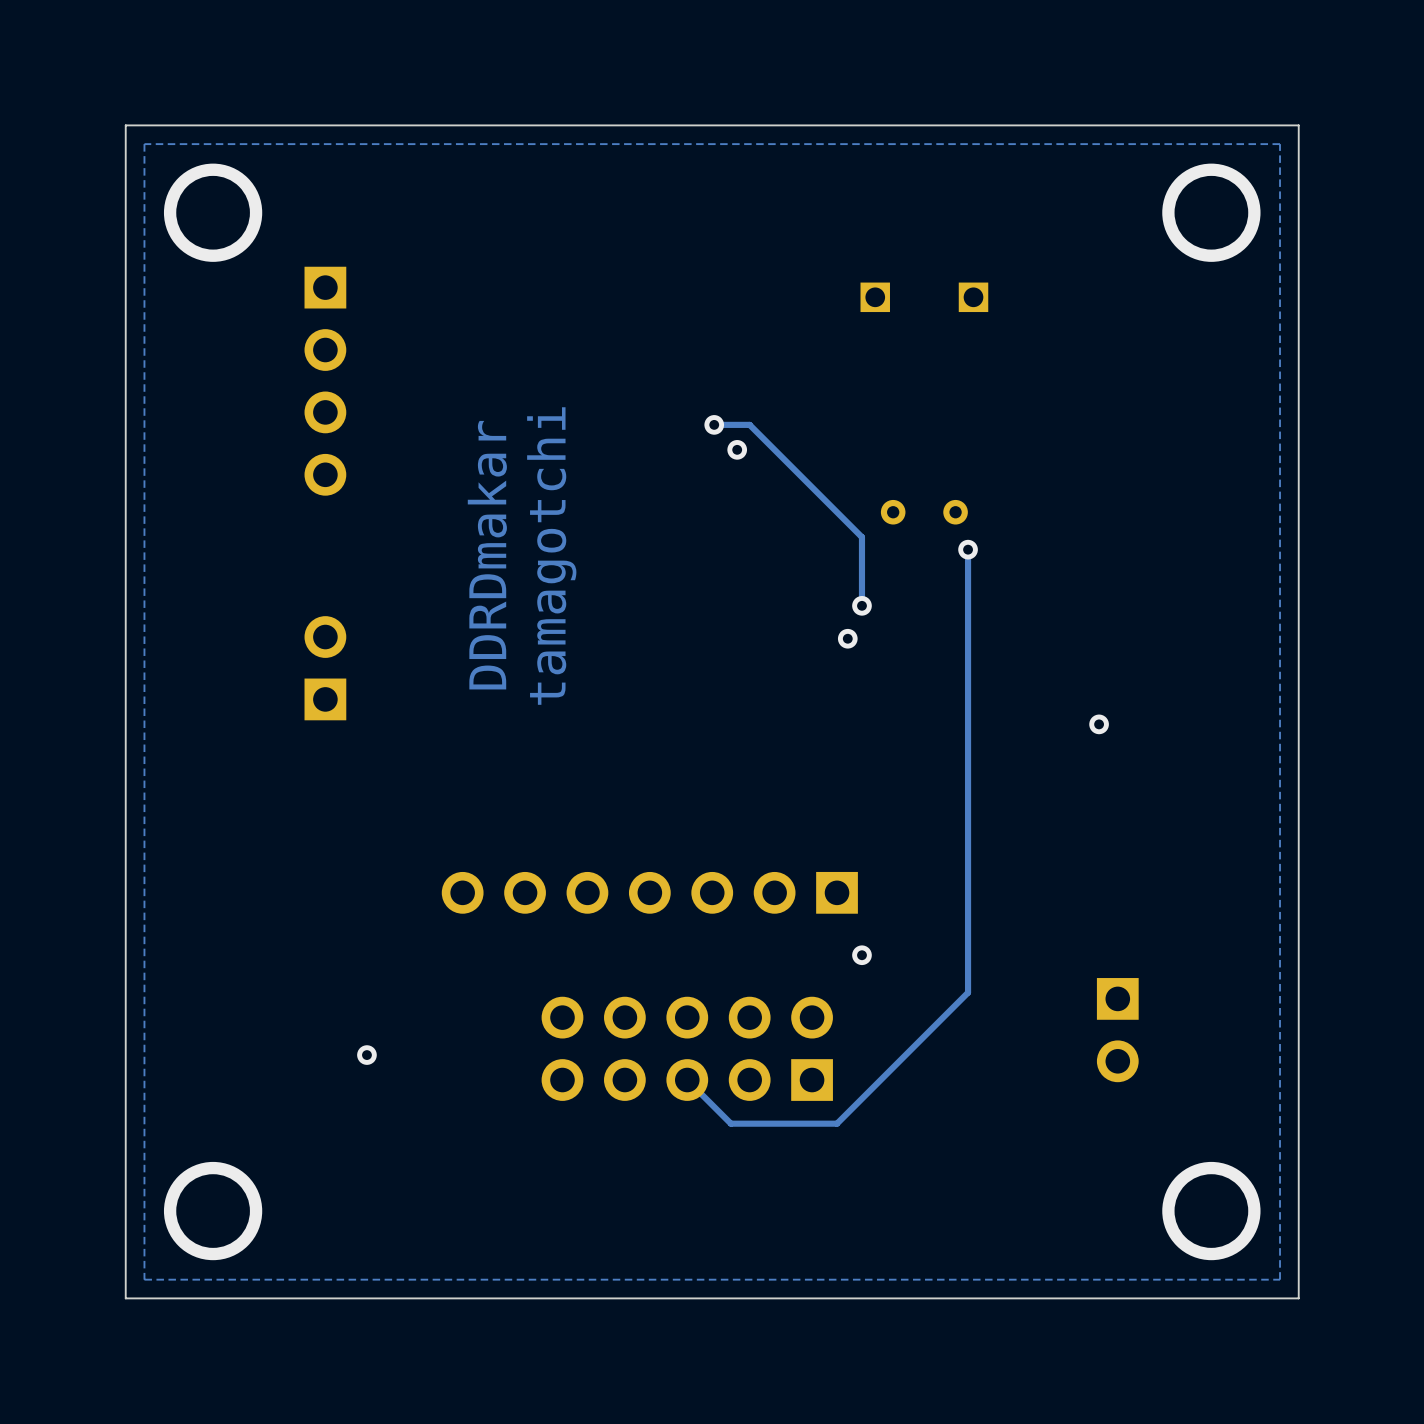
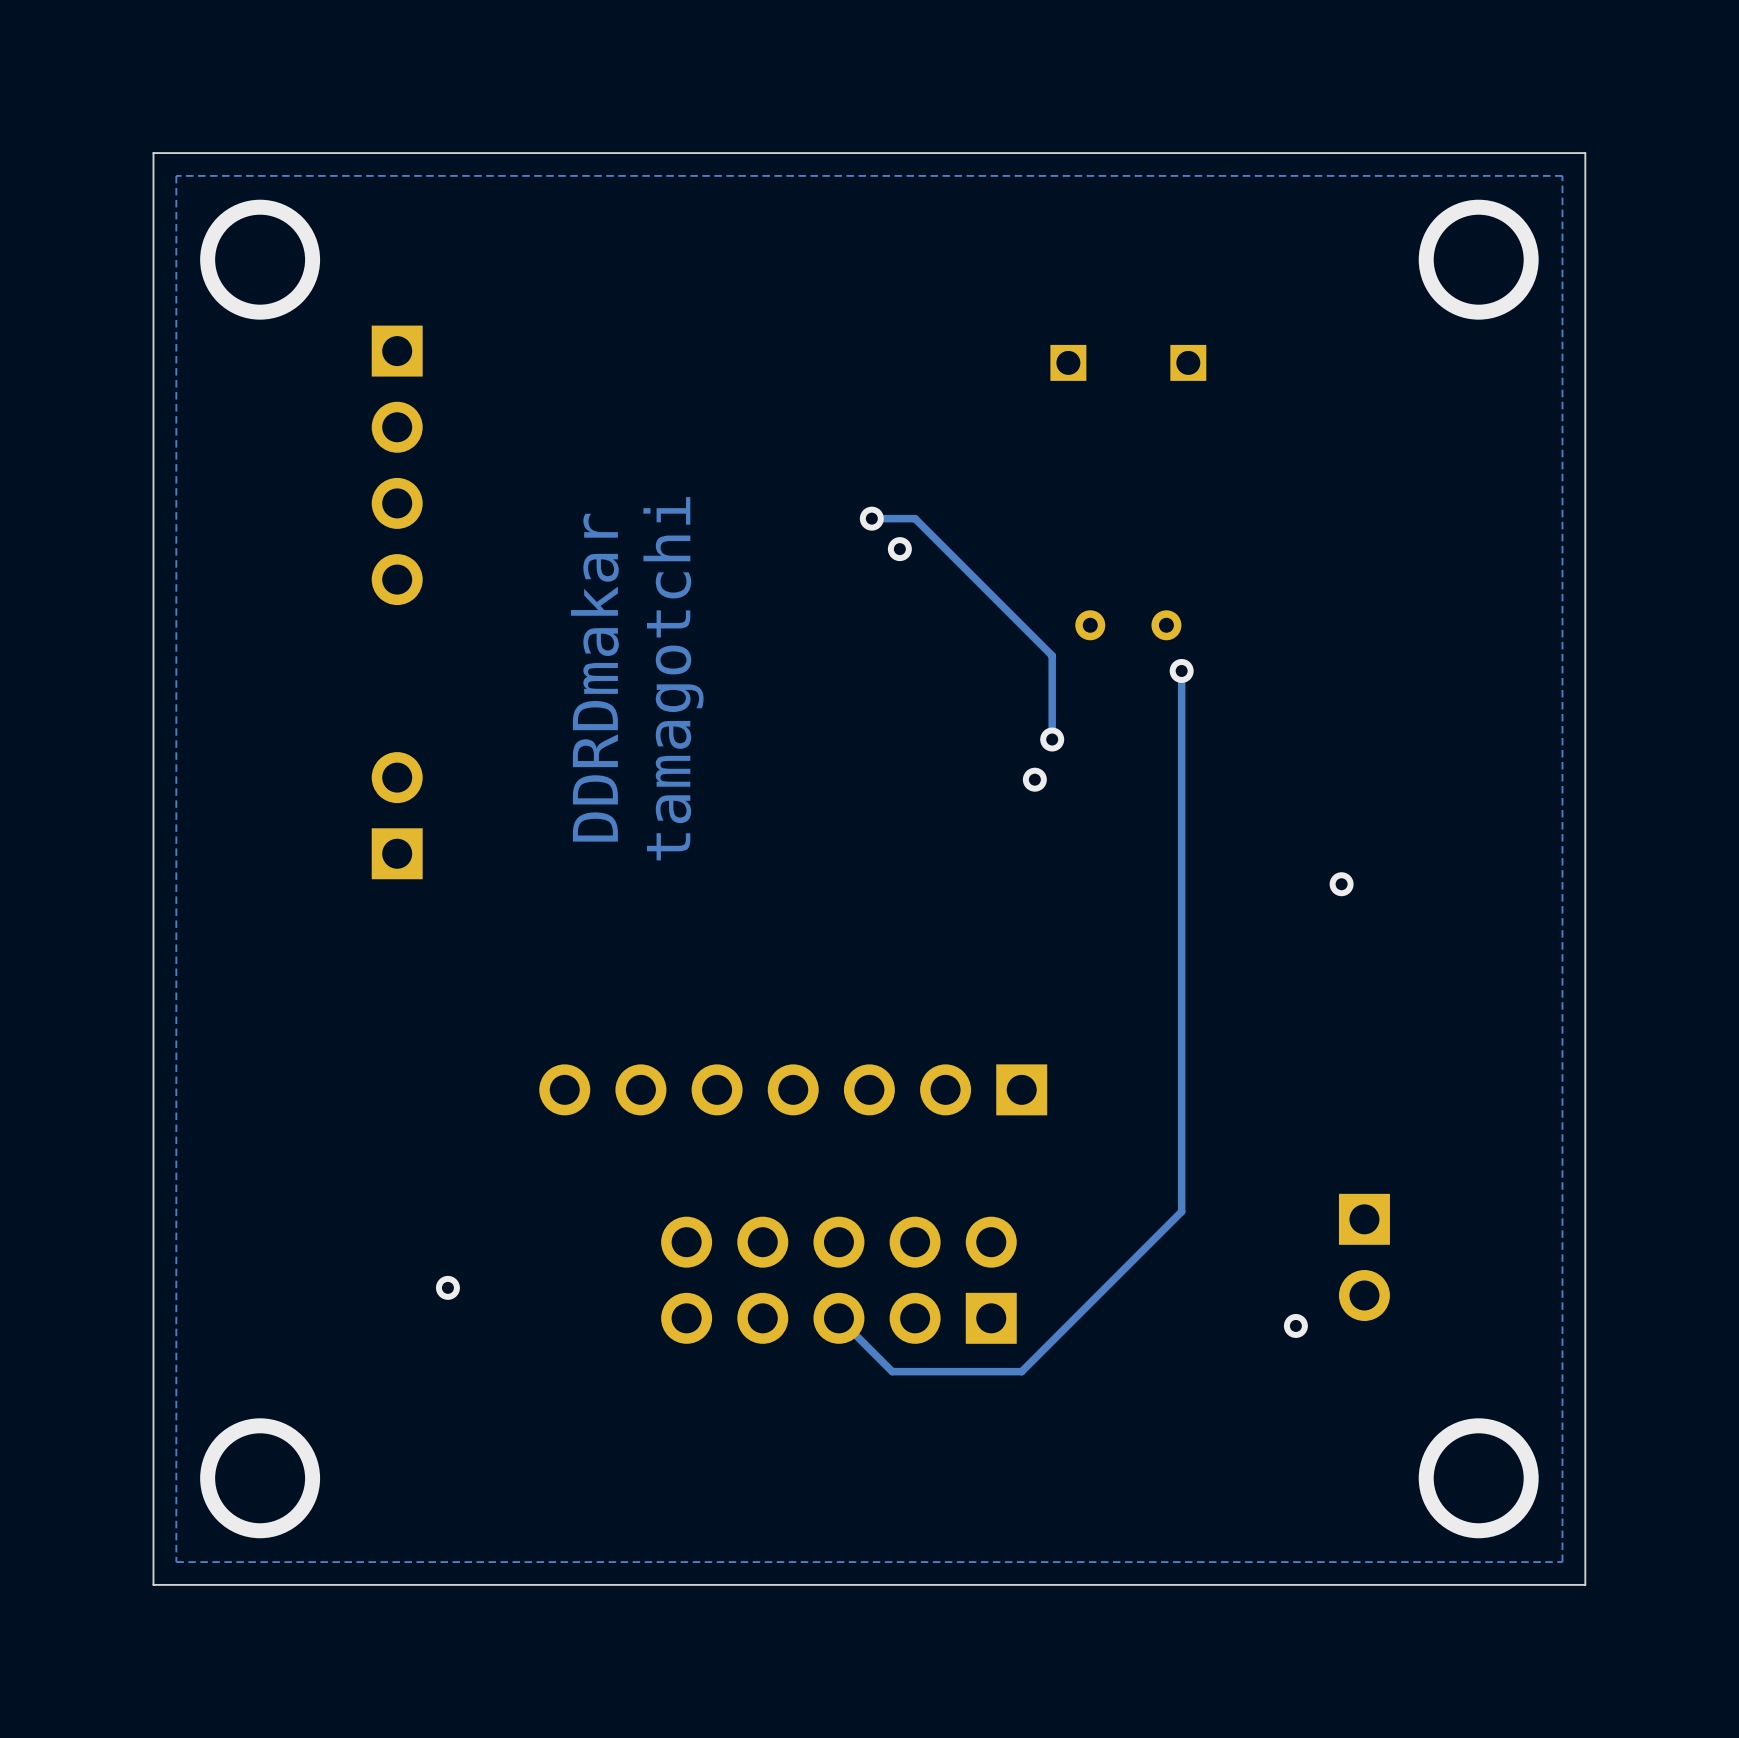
via: (861, 955) -> none
via: none -> (1295, 1325)

